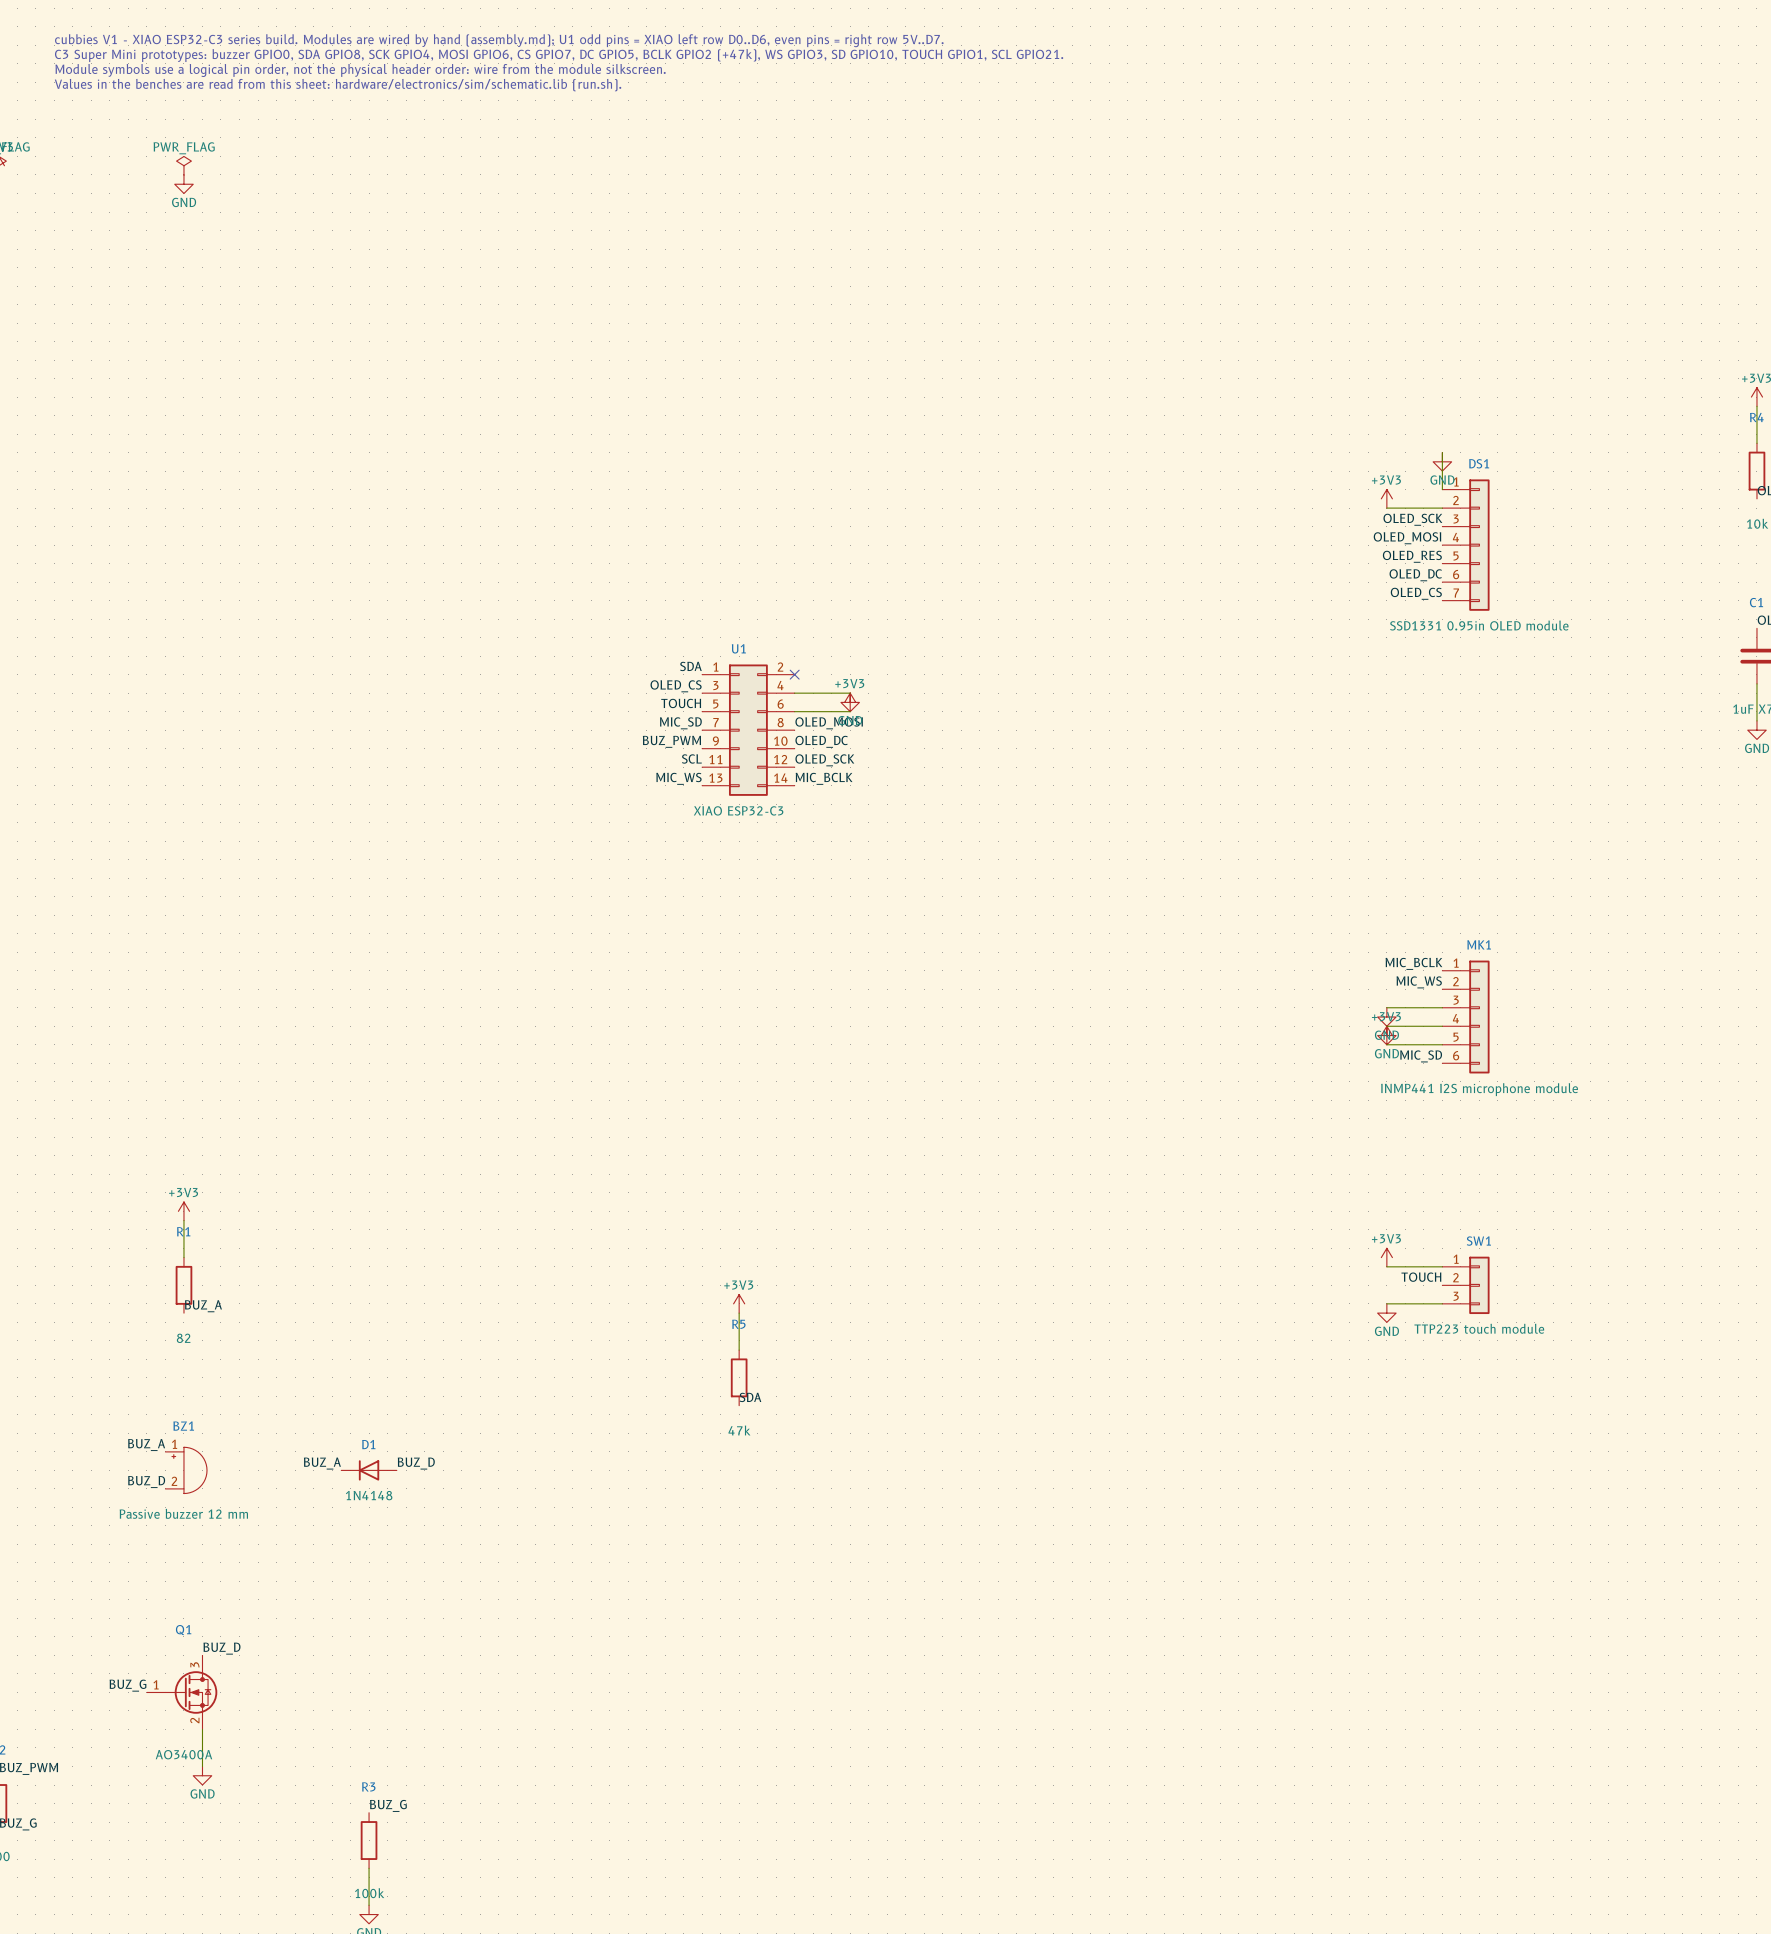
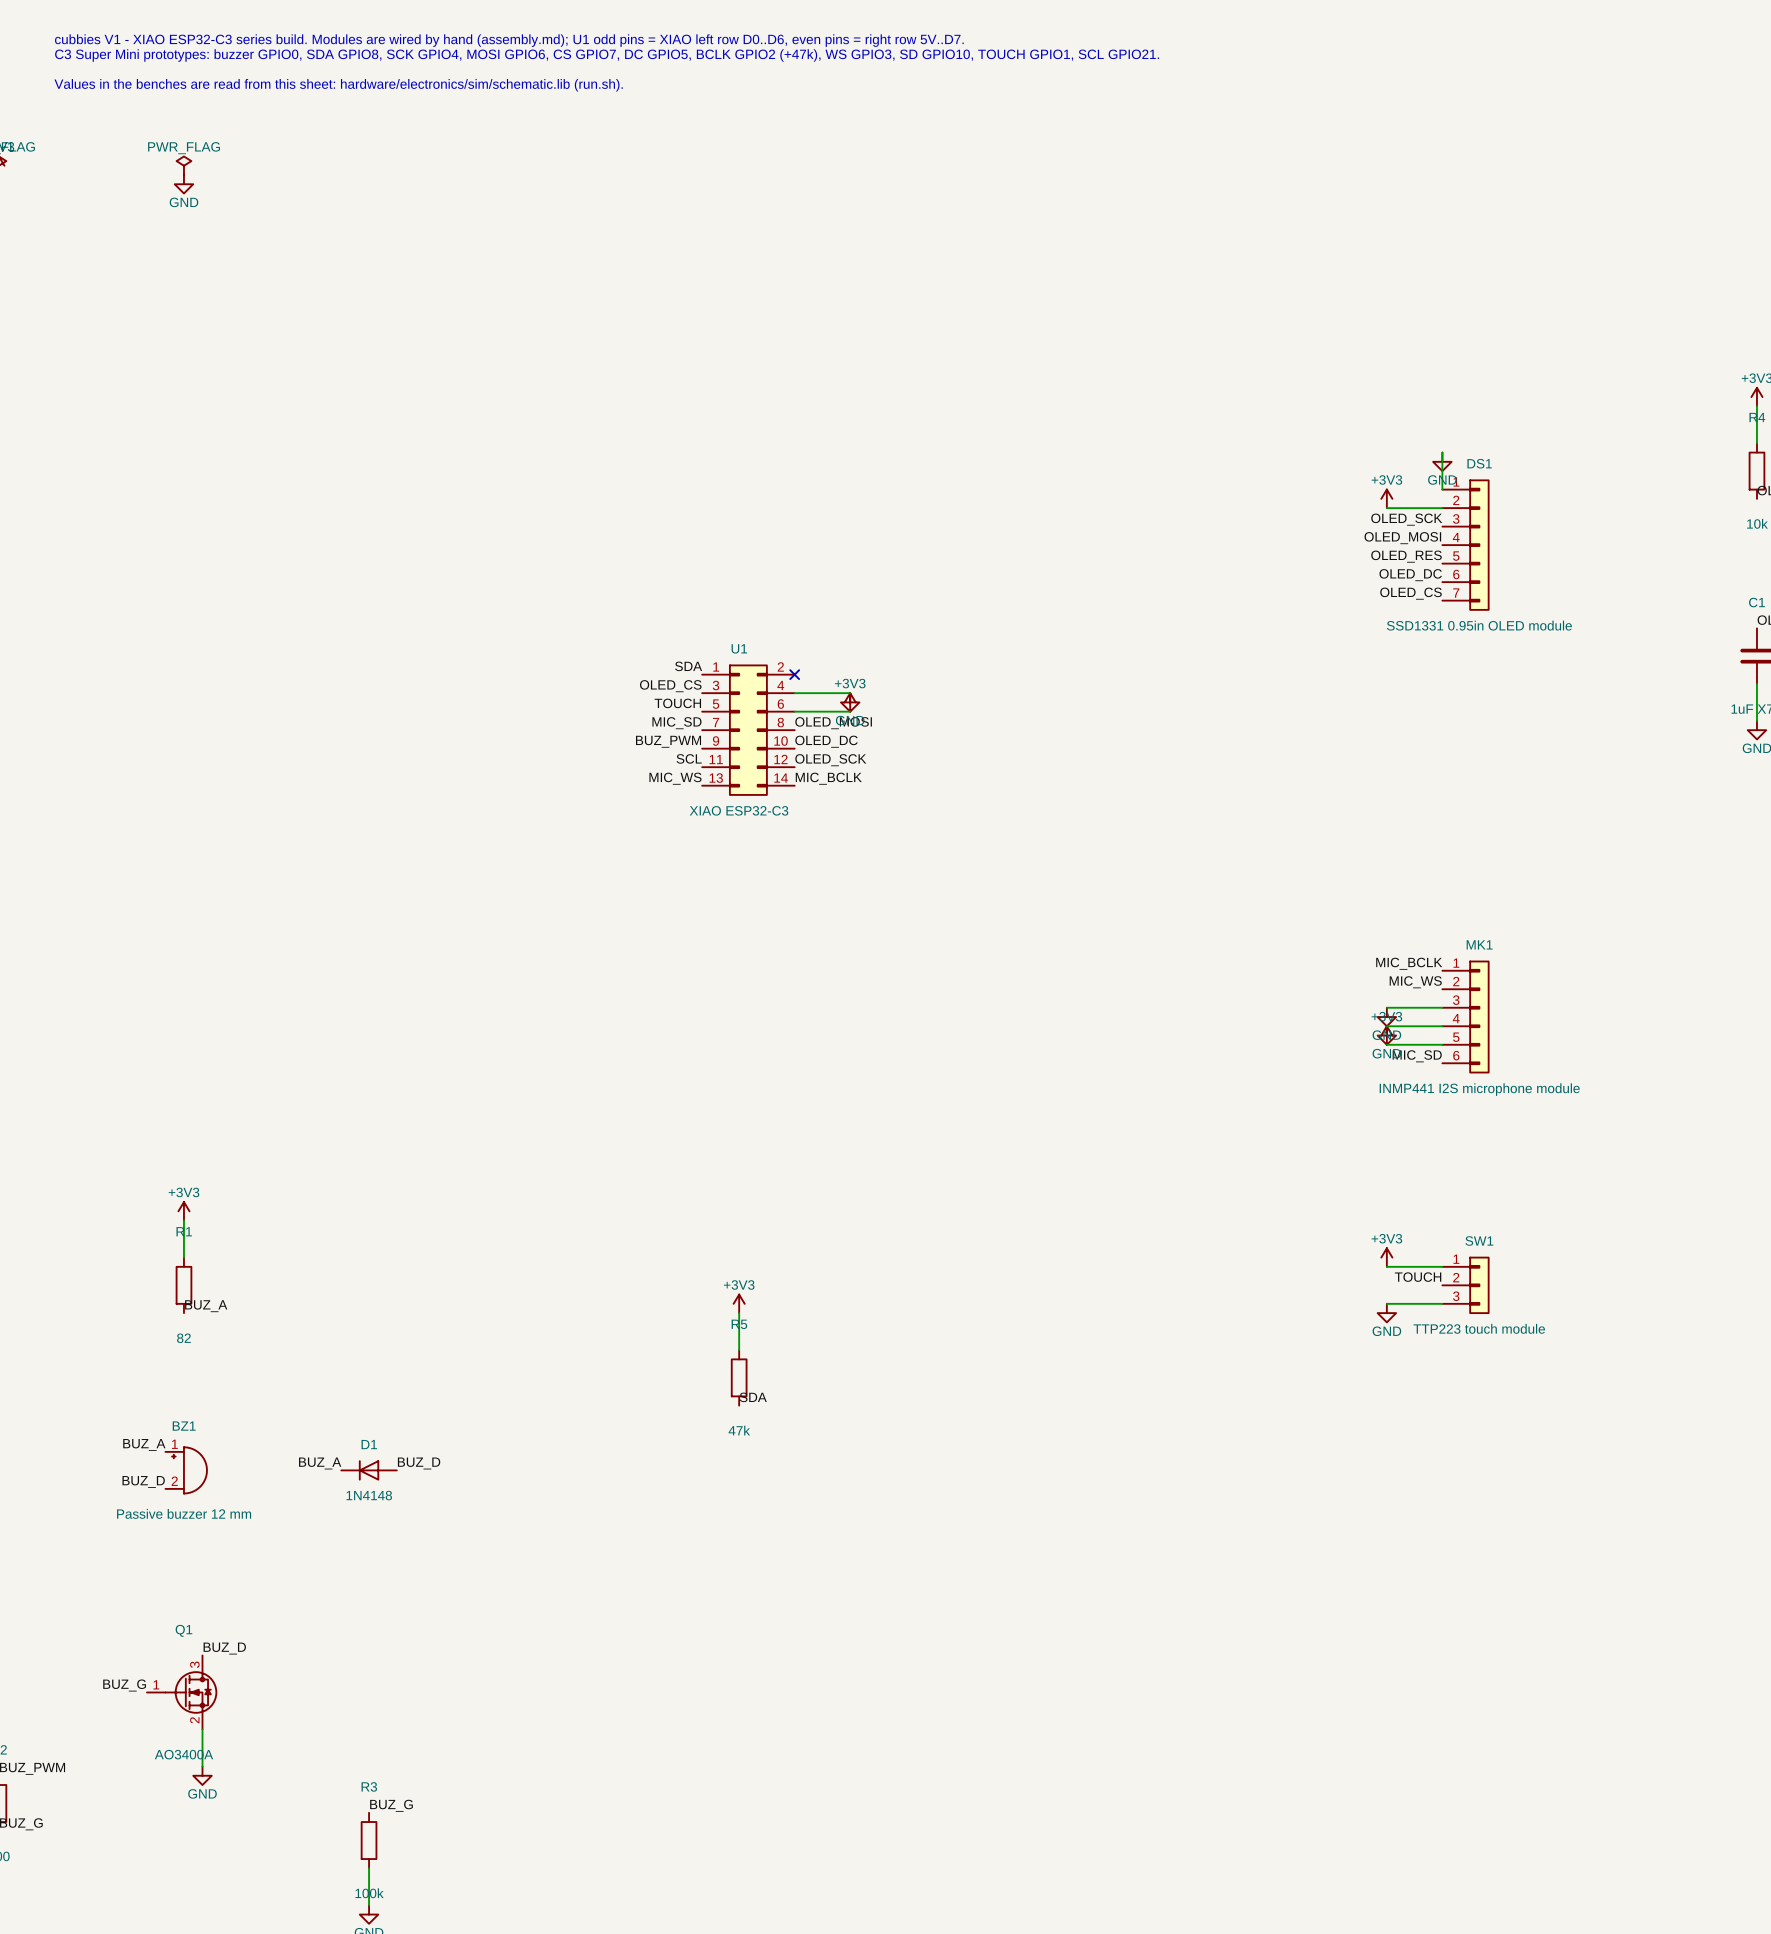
text: Module symbols use a logical pin order, not the physical header order: wire from the module silkscreen. (360, 70) -> none

